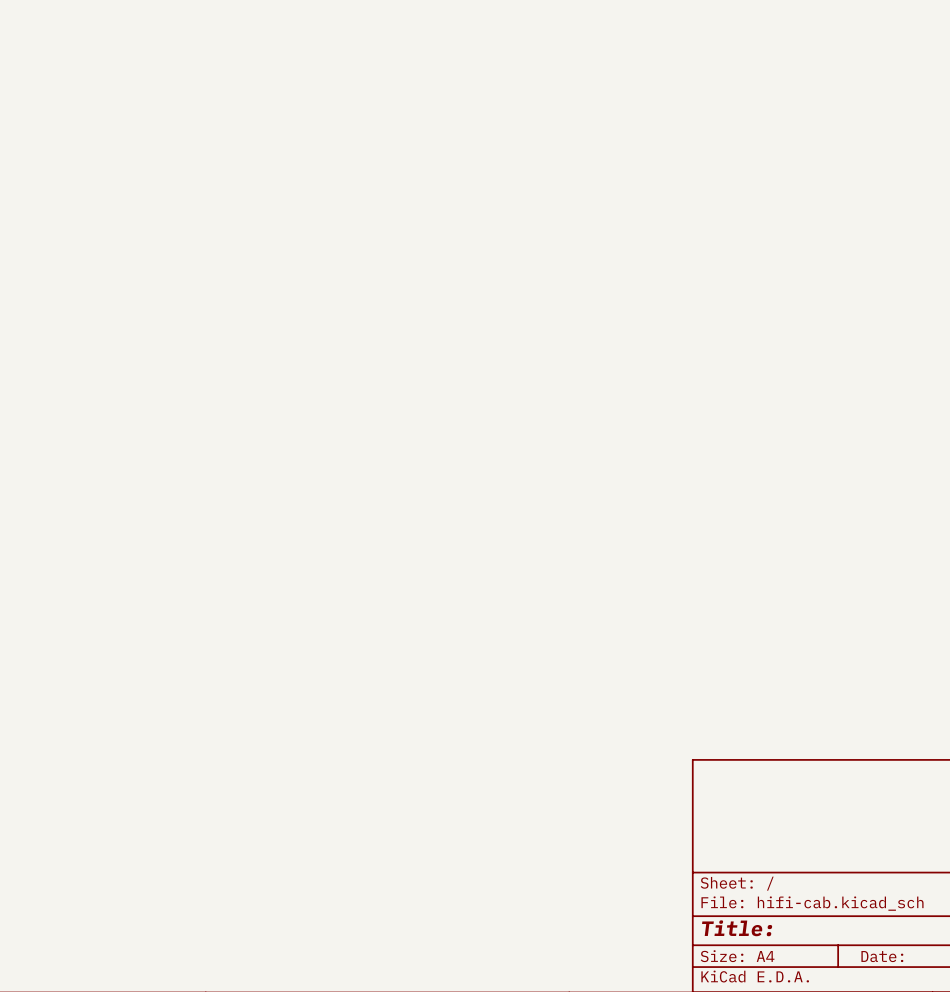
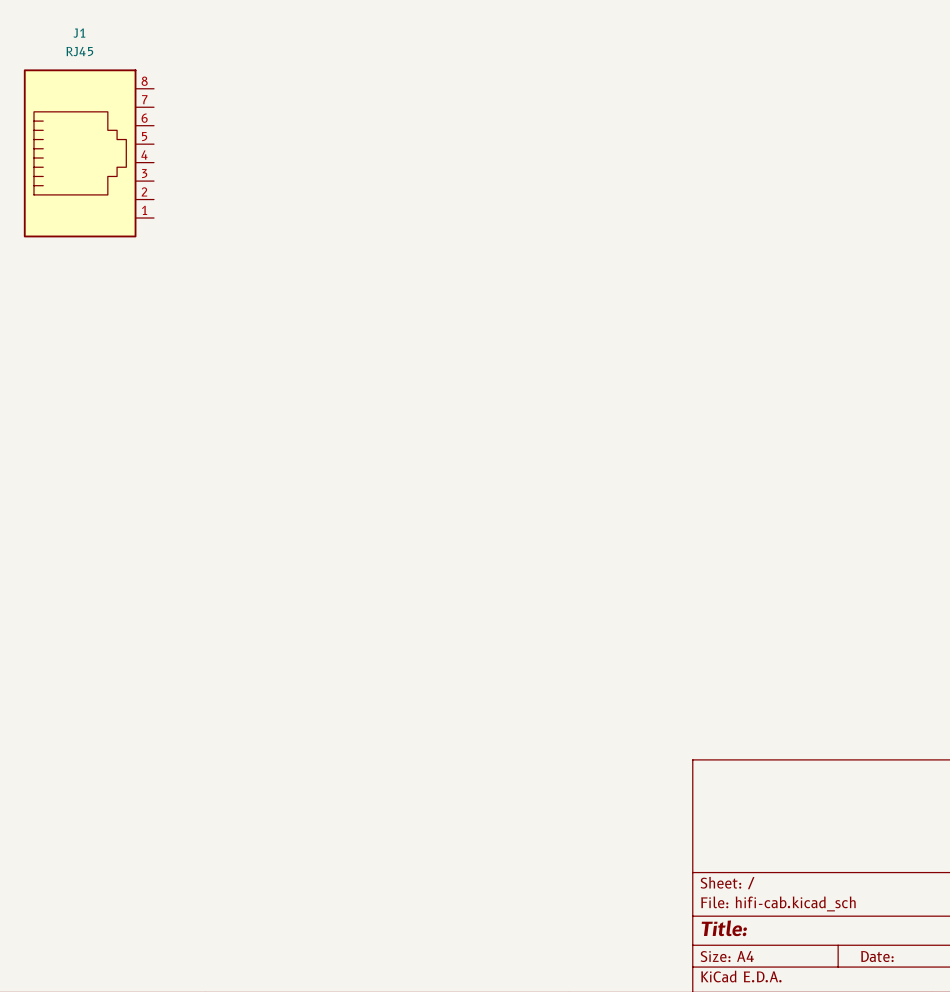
J1: none -> RJ45 (88, 153)

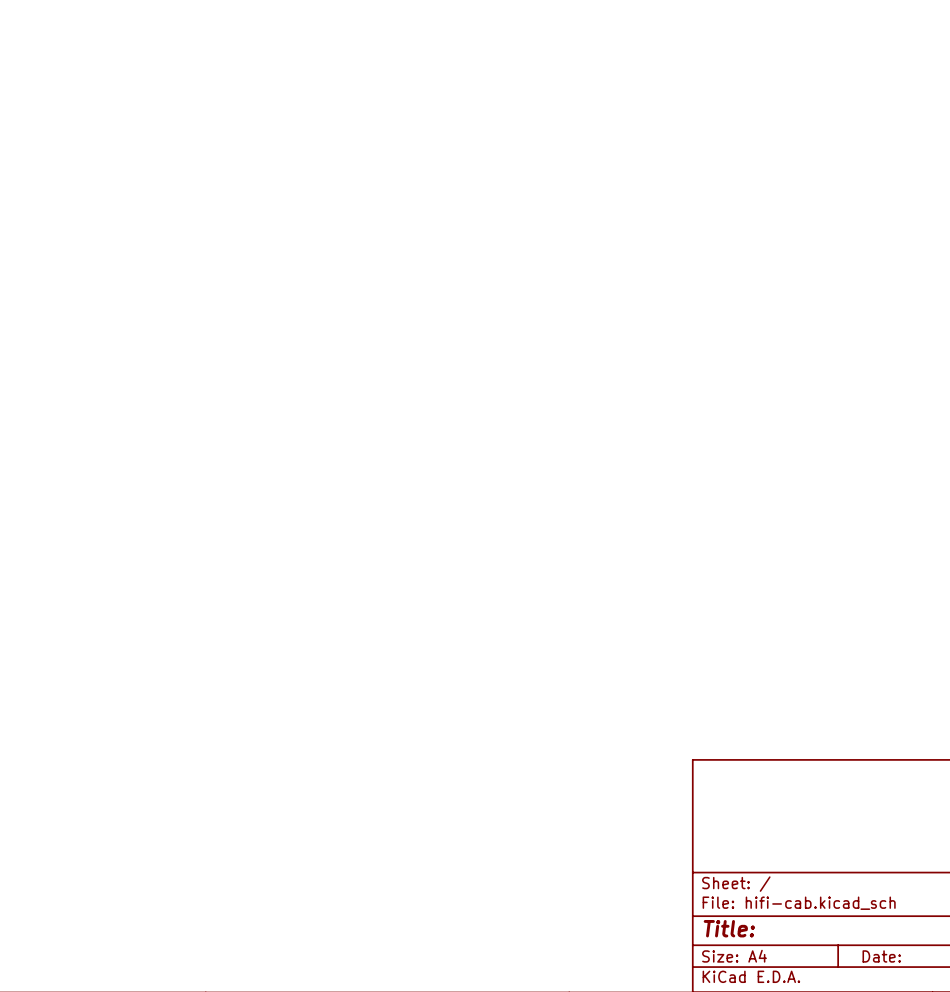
J1: RJ45 (88, 153) -> none

